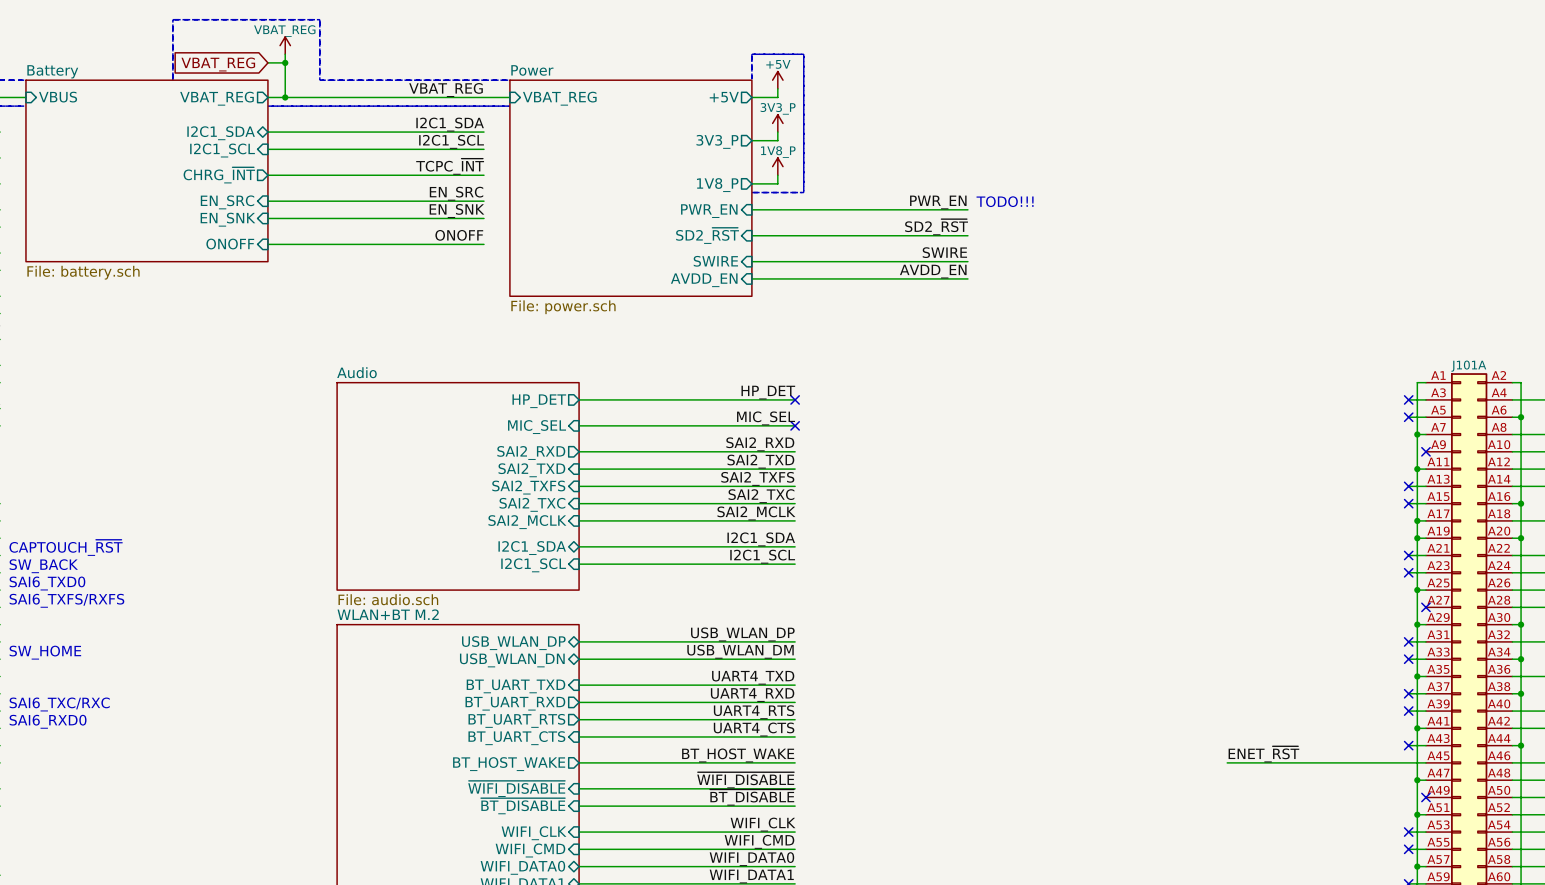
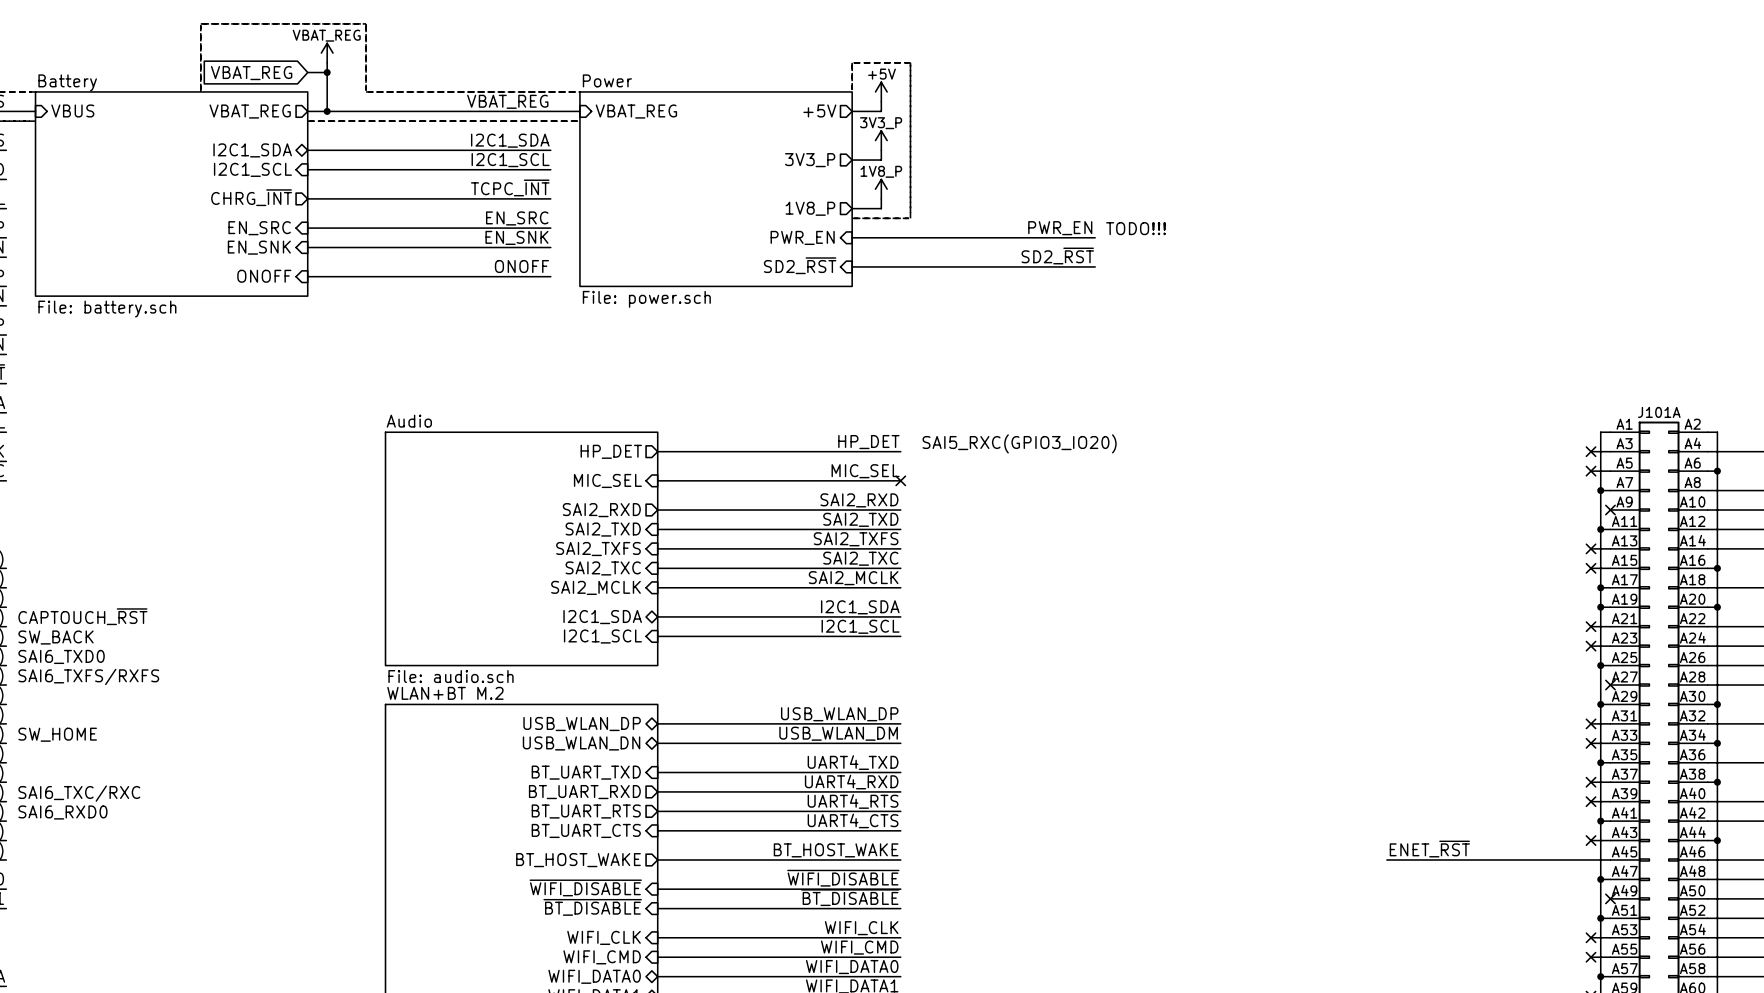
sheet Power: none -> File: power.sch (716, 189)
sheet Power: File: power.sch (630, 188) -> none
label: SWIRE (944, 252) -> none
sheet pin: SWIRE (715, 261) -> none
wire: (751, 261) (967, 261) -> none
label: AVDD_EN (933, 271) -> none
wire: (751, 278) (967, 278) -> none
sheet pin: AVDD_EN (704, 280) -> none
text: none -> SAI5_RXC(GPIO3_IO20) (1019, 443)
no-connect mark: (795, 399) -> none

